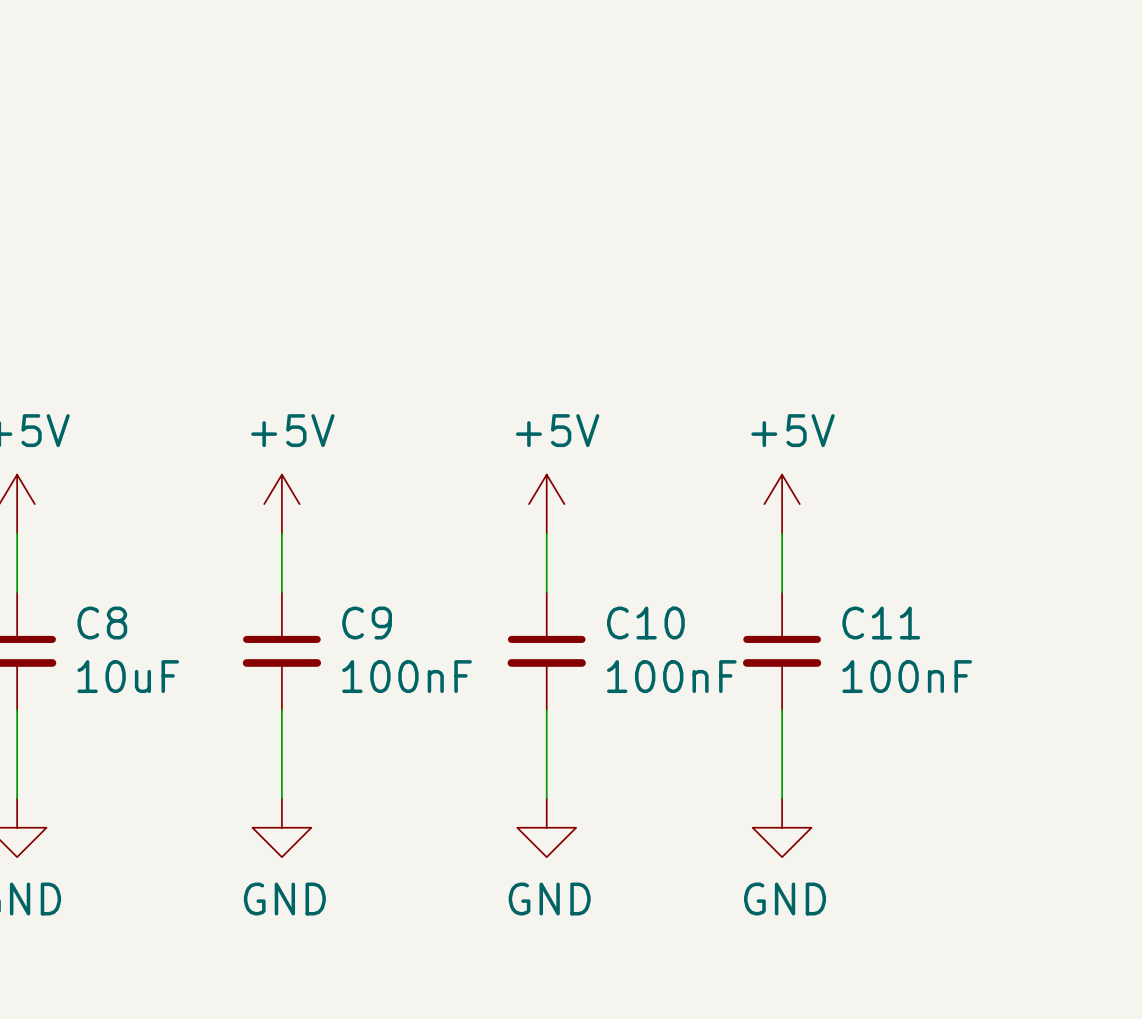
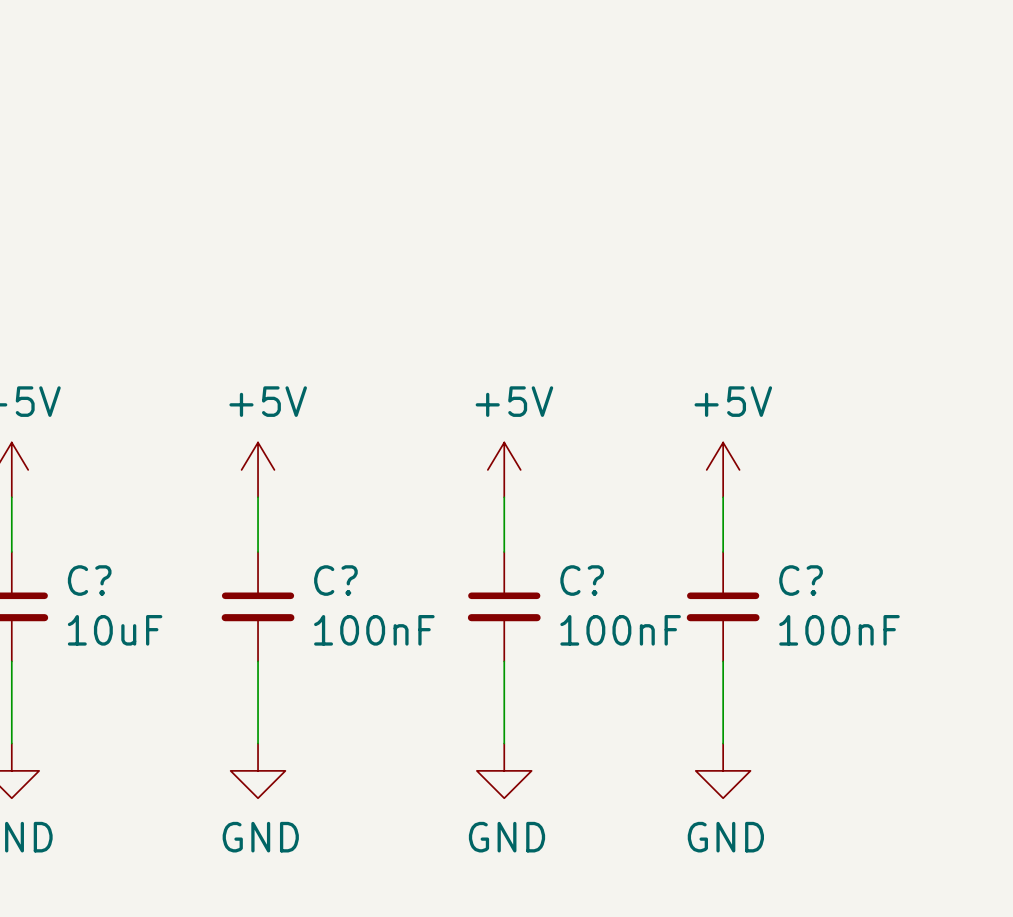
C8 name: C8 (102, 623) -> C? (89, 580)
C9 name: C9 (367, 623) -> C? (335, 580)
C10 name: C10 (645, 623) -> C? (582, 580)
C11 name: C11 (881, 623) -> C? (801, 580)

